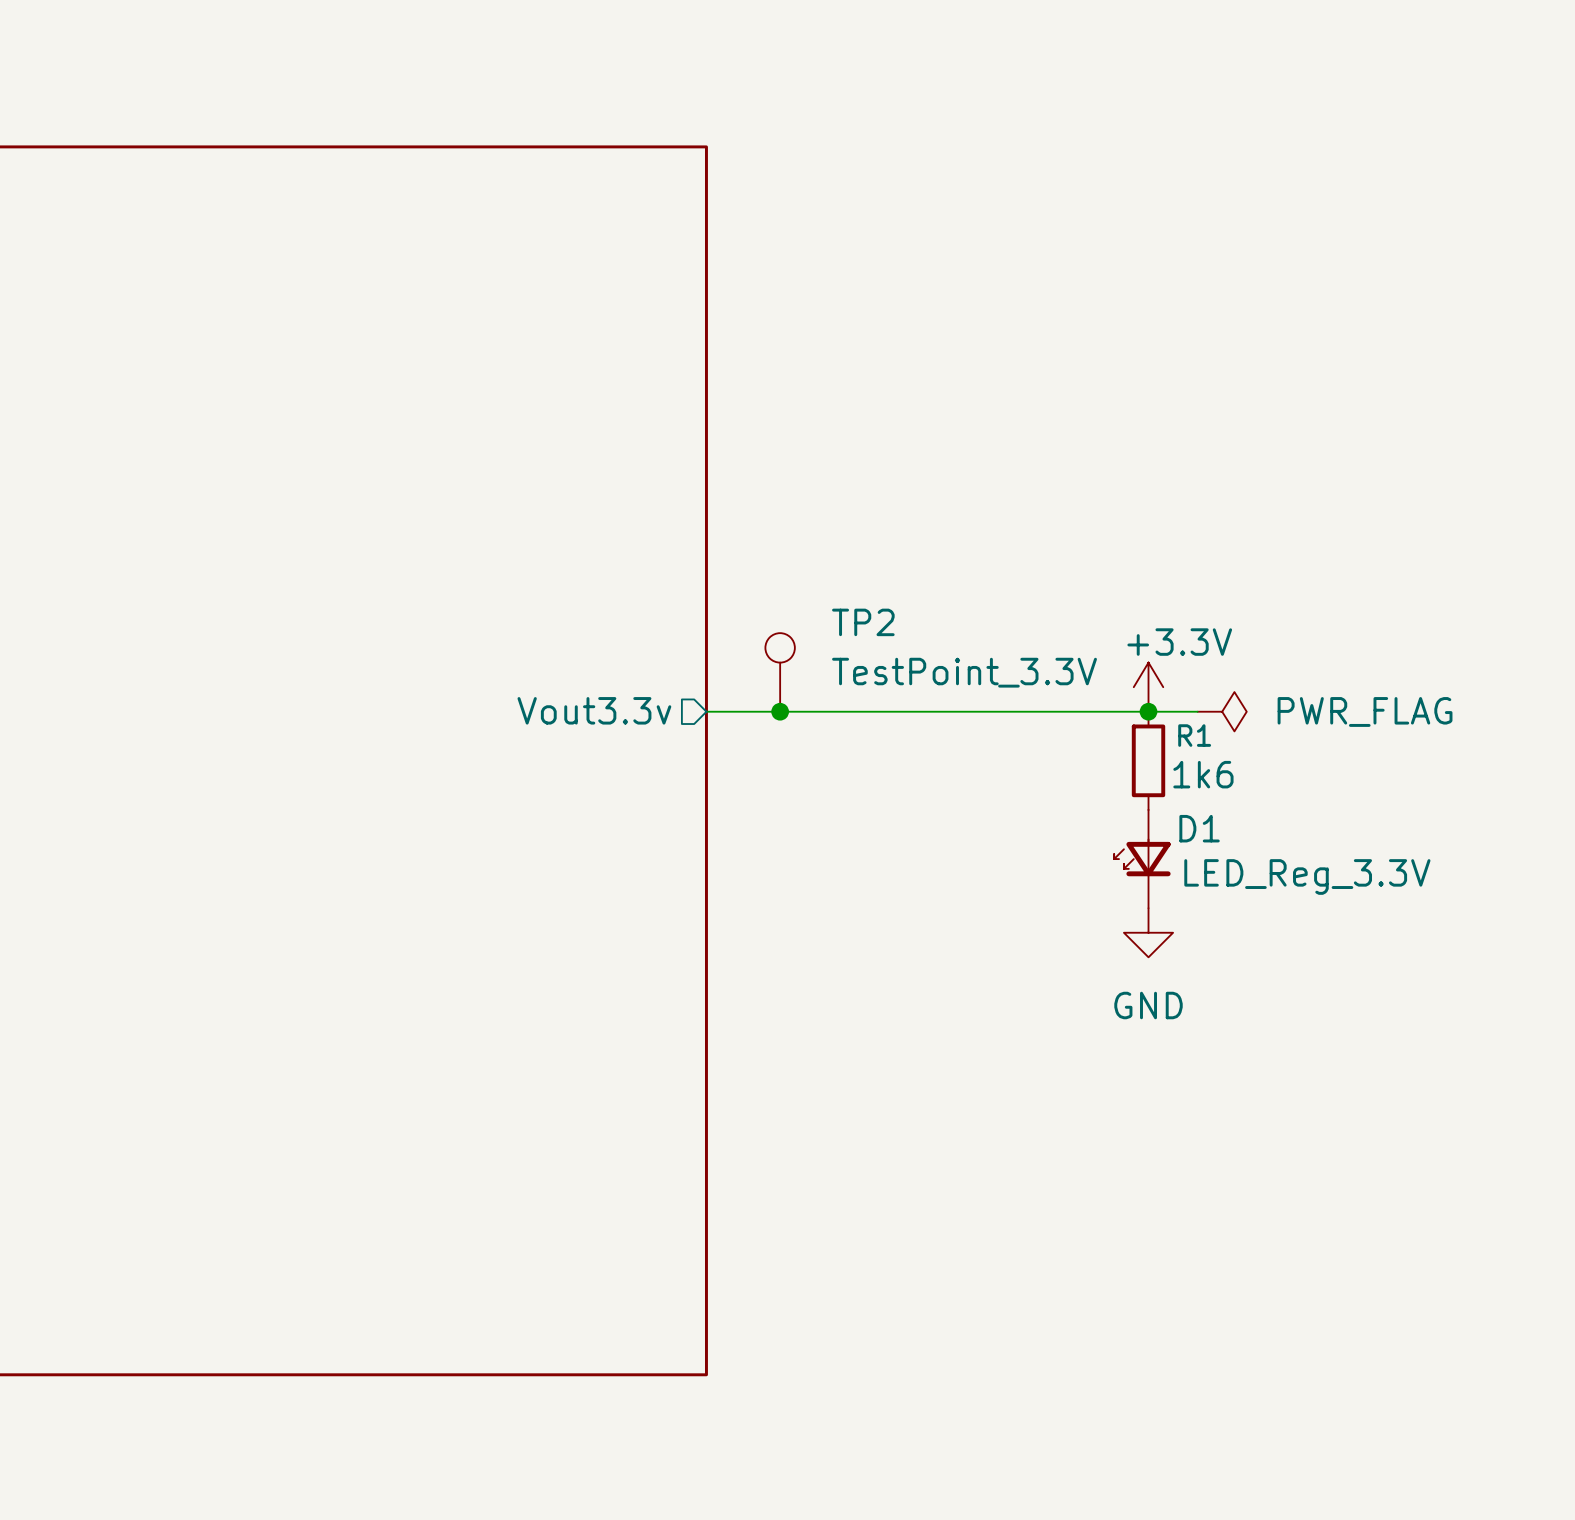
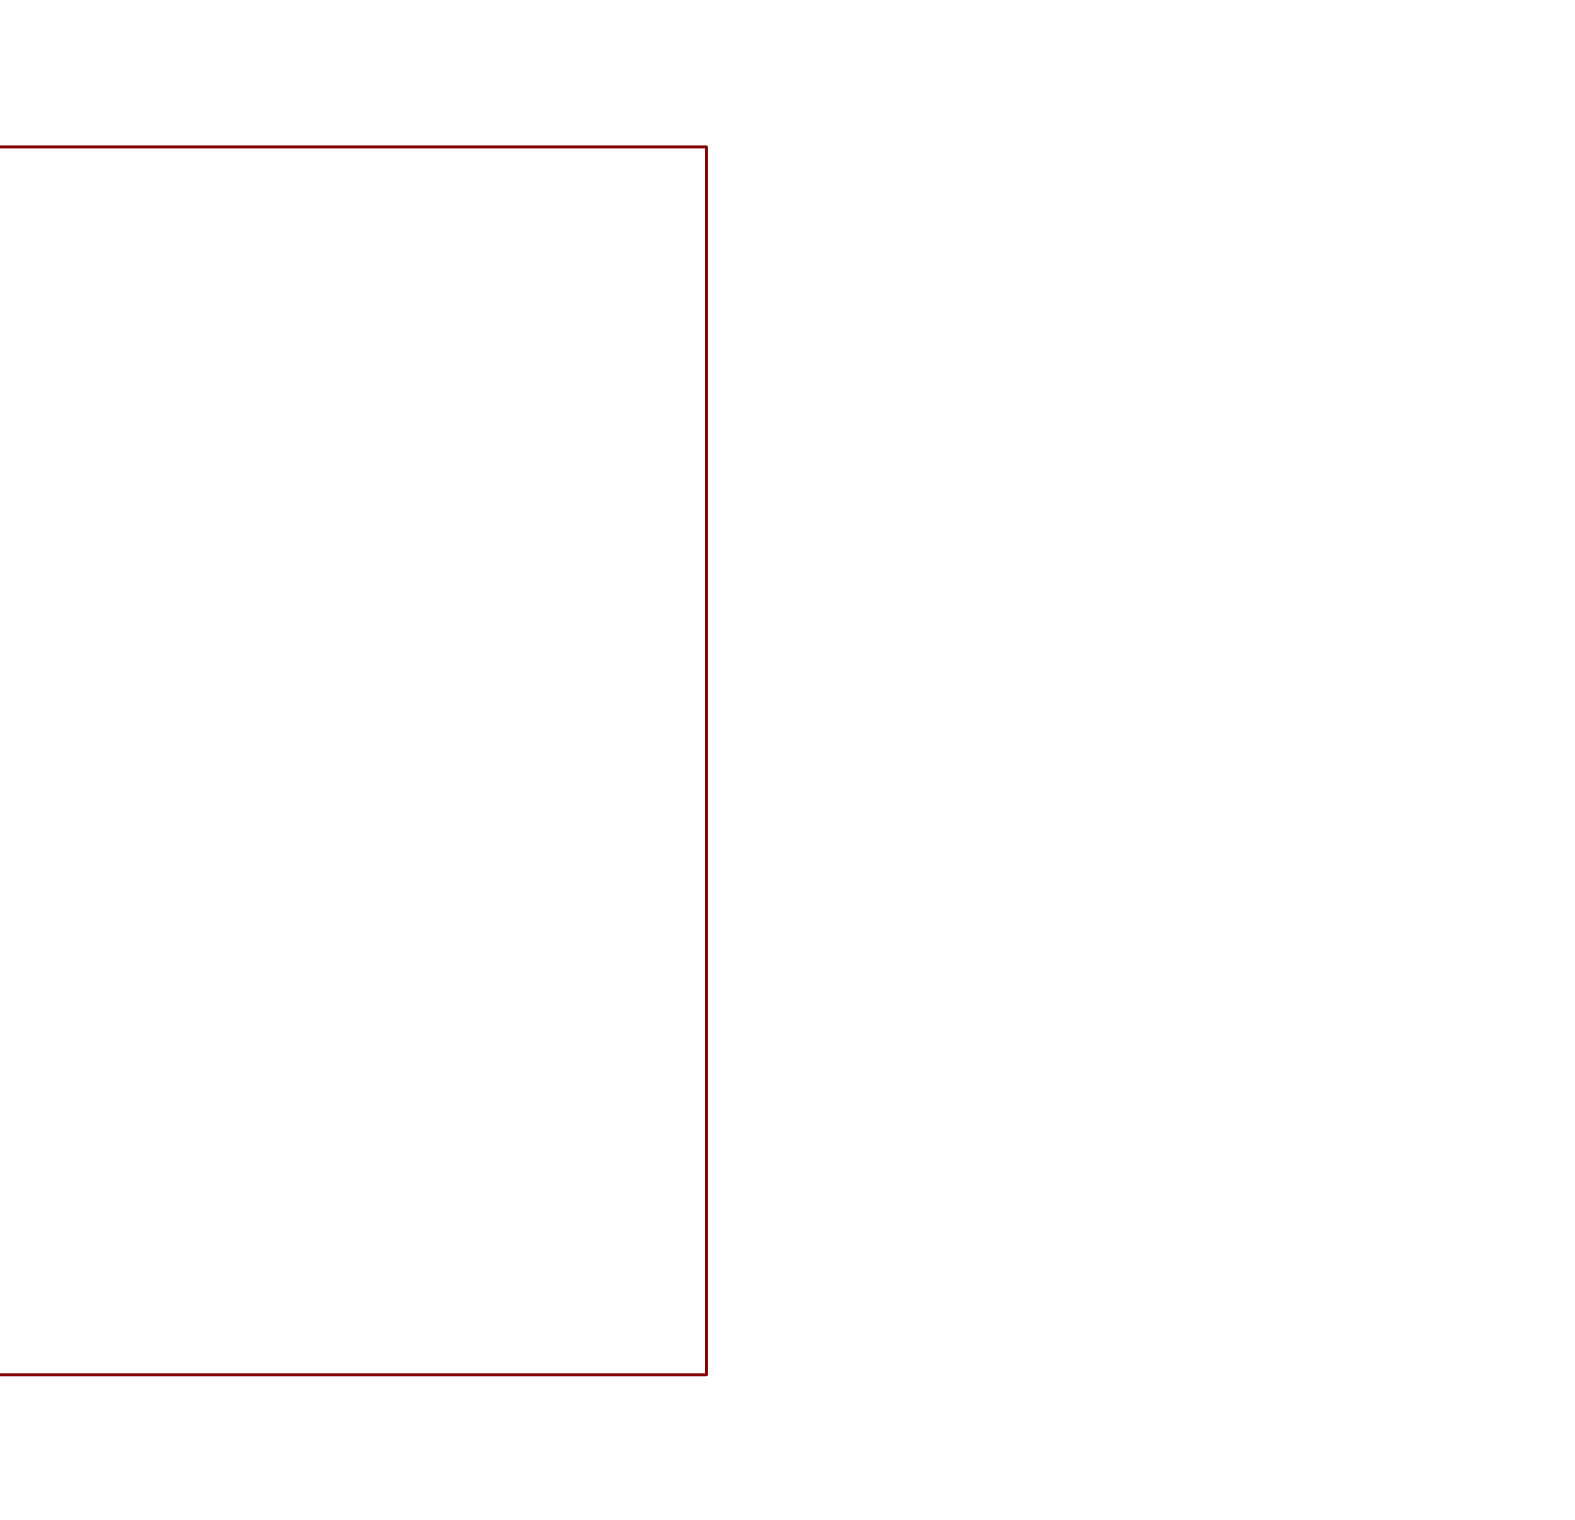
TP2: TestPoint_3.3V (780, 672) -> none
power symbol: +3.3V (1148, 687) -> none
sheet pin: Vout3.3v (594, 710) -> none
wire: (706, 711) (1197, 711) -> none
junction: (780, 711) -> none
junction: (1148, 711) -> none
power symbol: PWR_FLAG (1222, 711) -> none
R1: 1k6 (1148, 760) -> none
D1: LED_Reg_3.3V (1142, 859) -> none
power symbol: GND (1148, 932) -> none

